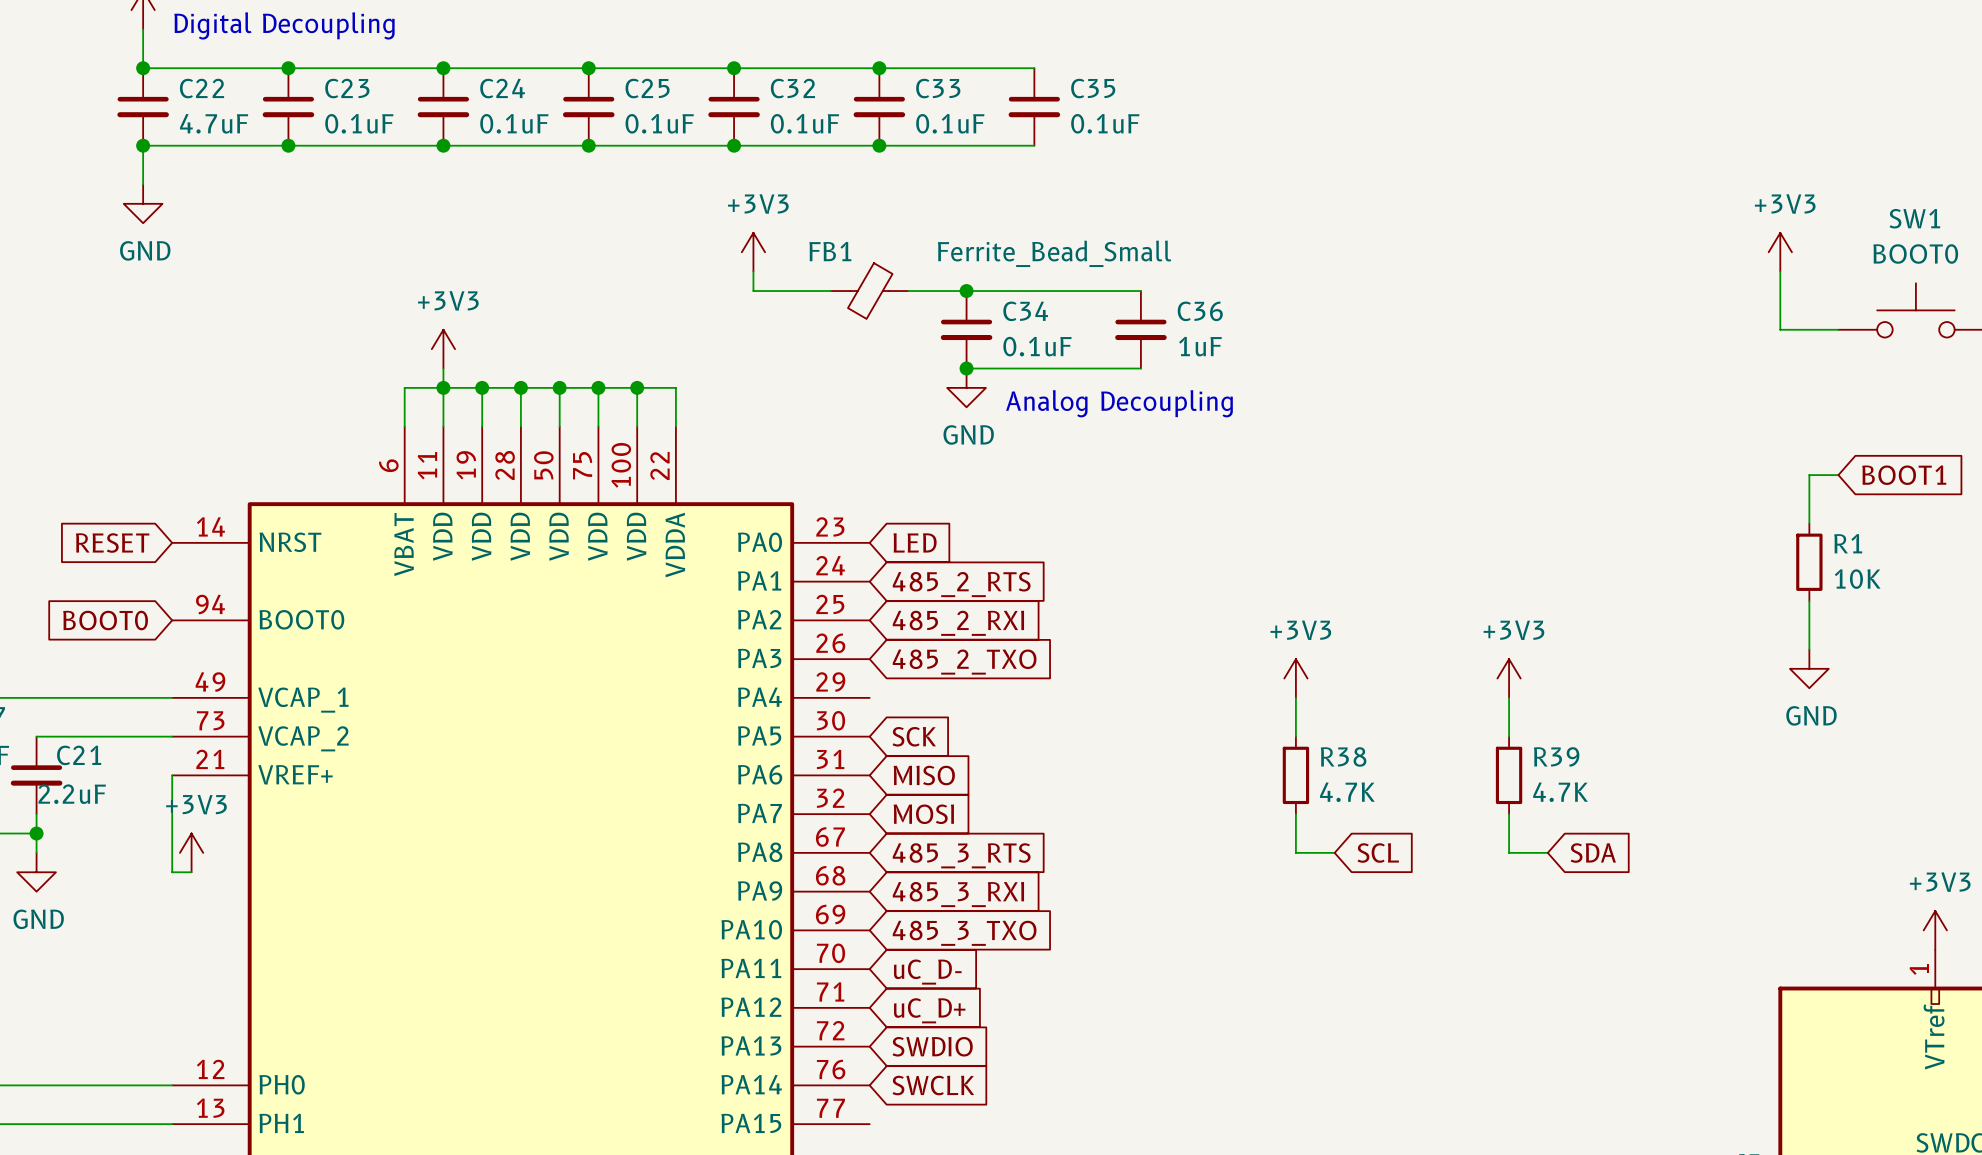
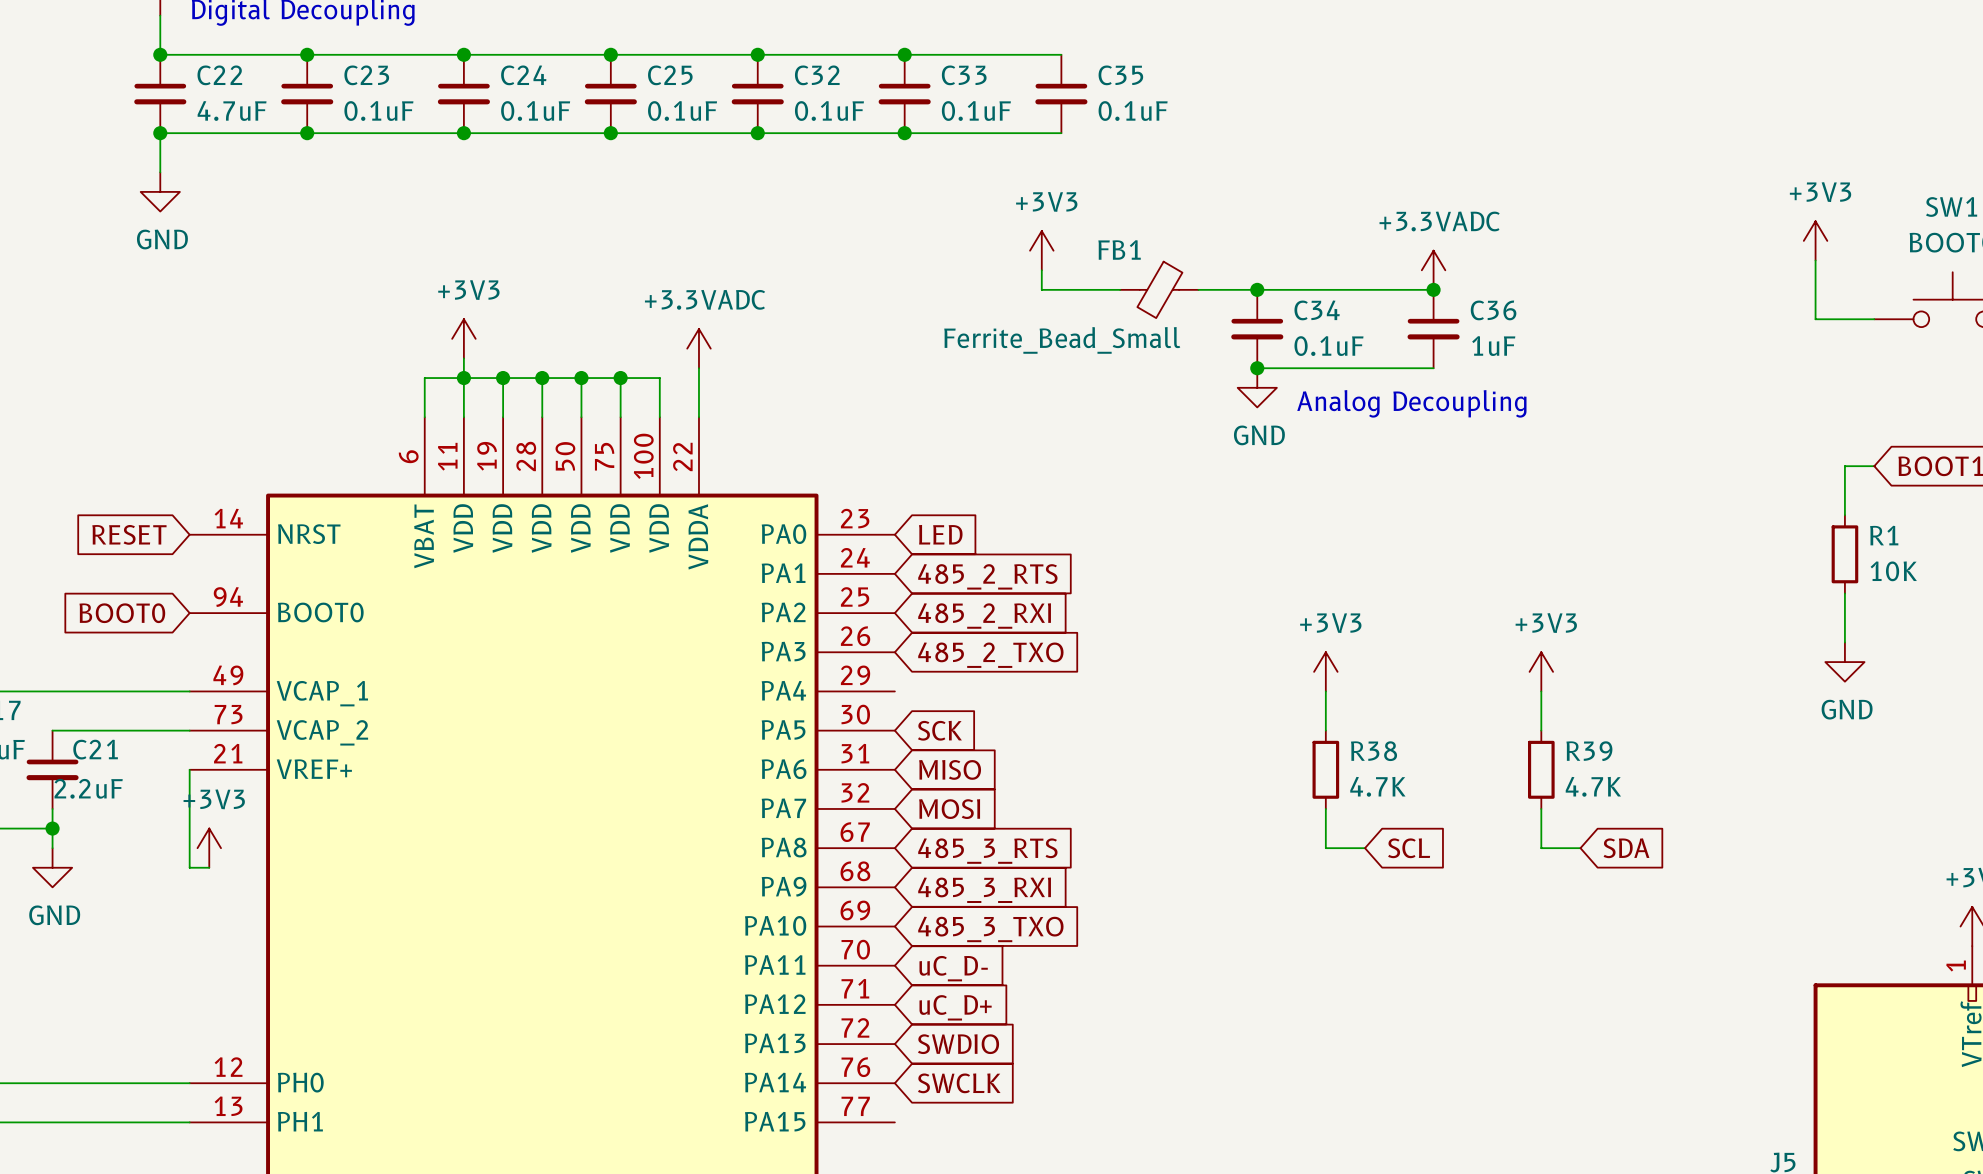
power symbol position: +3V3 (753, 252) -> +3V3 (1041, 250)
FB1 value position: Ferrite_Bead_Small (1054, 253) -> Ferrite_Bead_Small (1062, 340)
wire: (753, 271) (753, 291) (830, 291) -> (1041, 270) (1041, 289) (1120, 289)
power symbol: none -> +3.3VADC (1433, 270)
FB1 position: (869, 291) -> (1159, 289)
wire: (908, 291) (1140, 291) -> (1198, 289) (1433, 289)
junction: (966, 291) -> none
junction: none -> (1257, 289)
junction: none -> (1433, 289)
C34 position: (966, 329) -> (1257, 329)
C36 position: (1140, 329) -> (1433, 329)
power symbol: none -> +3.3VADC (698, 348)
wire: (966, 368) (1140, 368) -> (1257, 368) (1433, 368)
junction: (966, 368) -> none
junction: none -> (1257, 368)
wire: (637, 387) (675, 387) -> (698, 368) (698, 378)
junction: (637, 387) -> none
power symbol position: GND (966, 387) -> GND (1257, 387)
text position: Analog Decoupling (1119, 403) -> Analog Decoupling (1411, 403)

